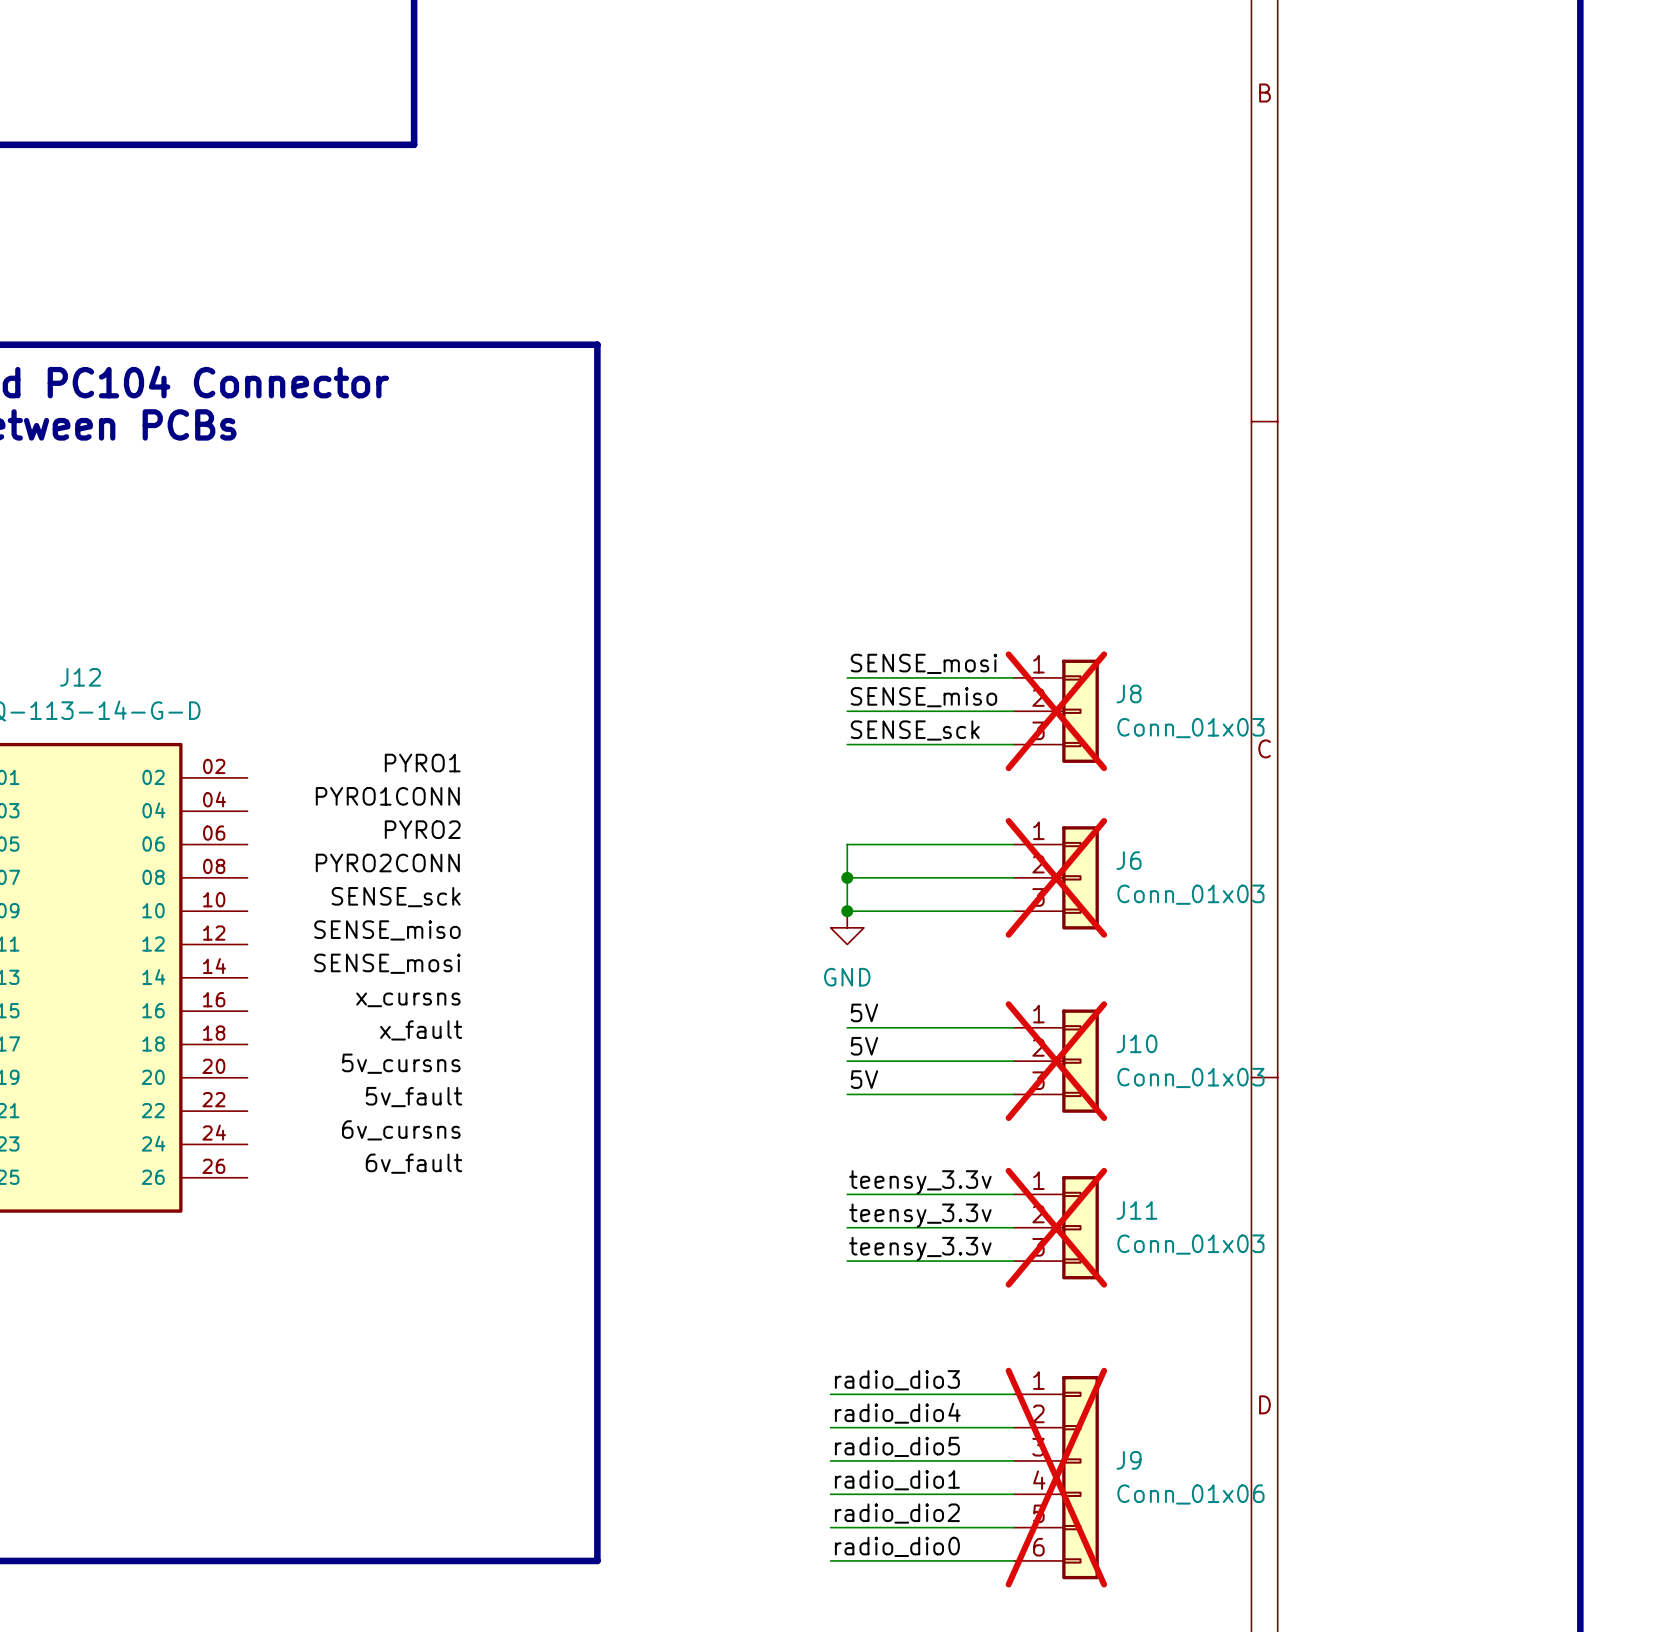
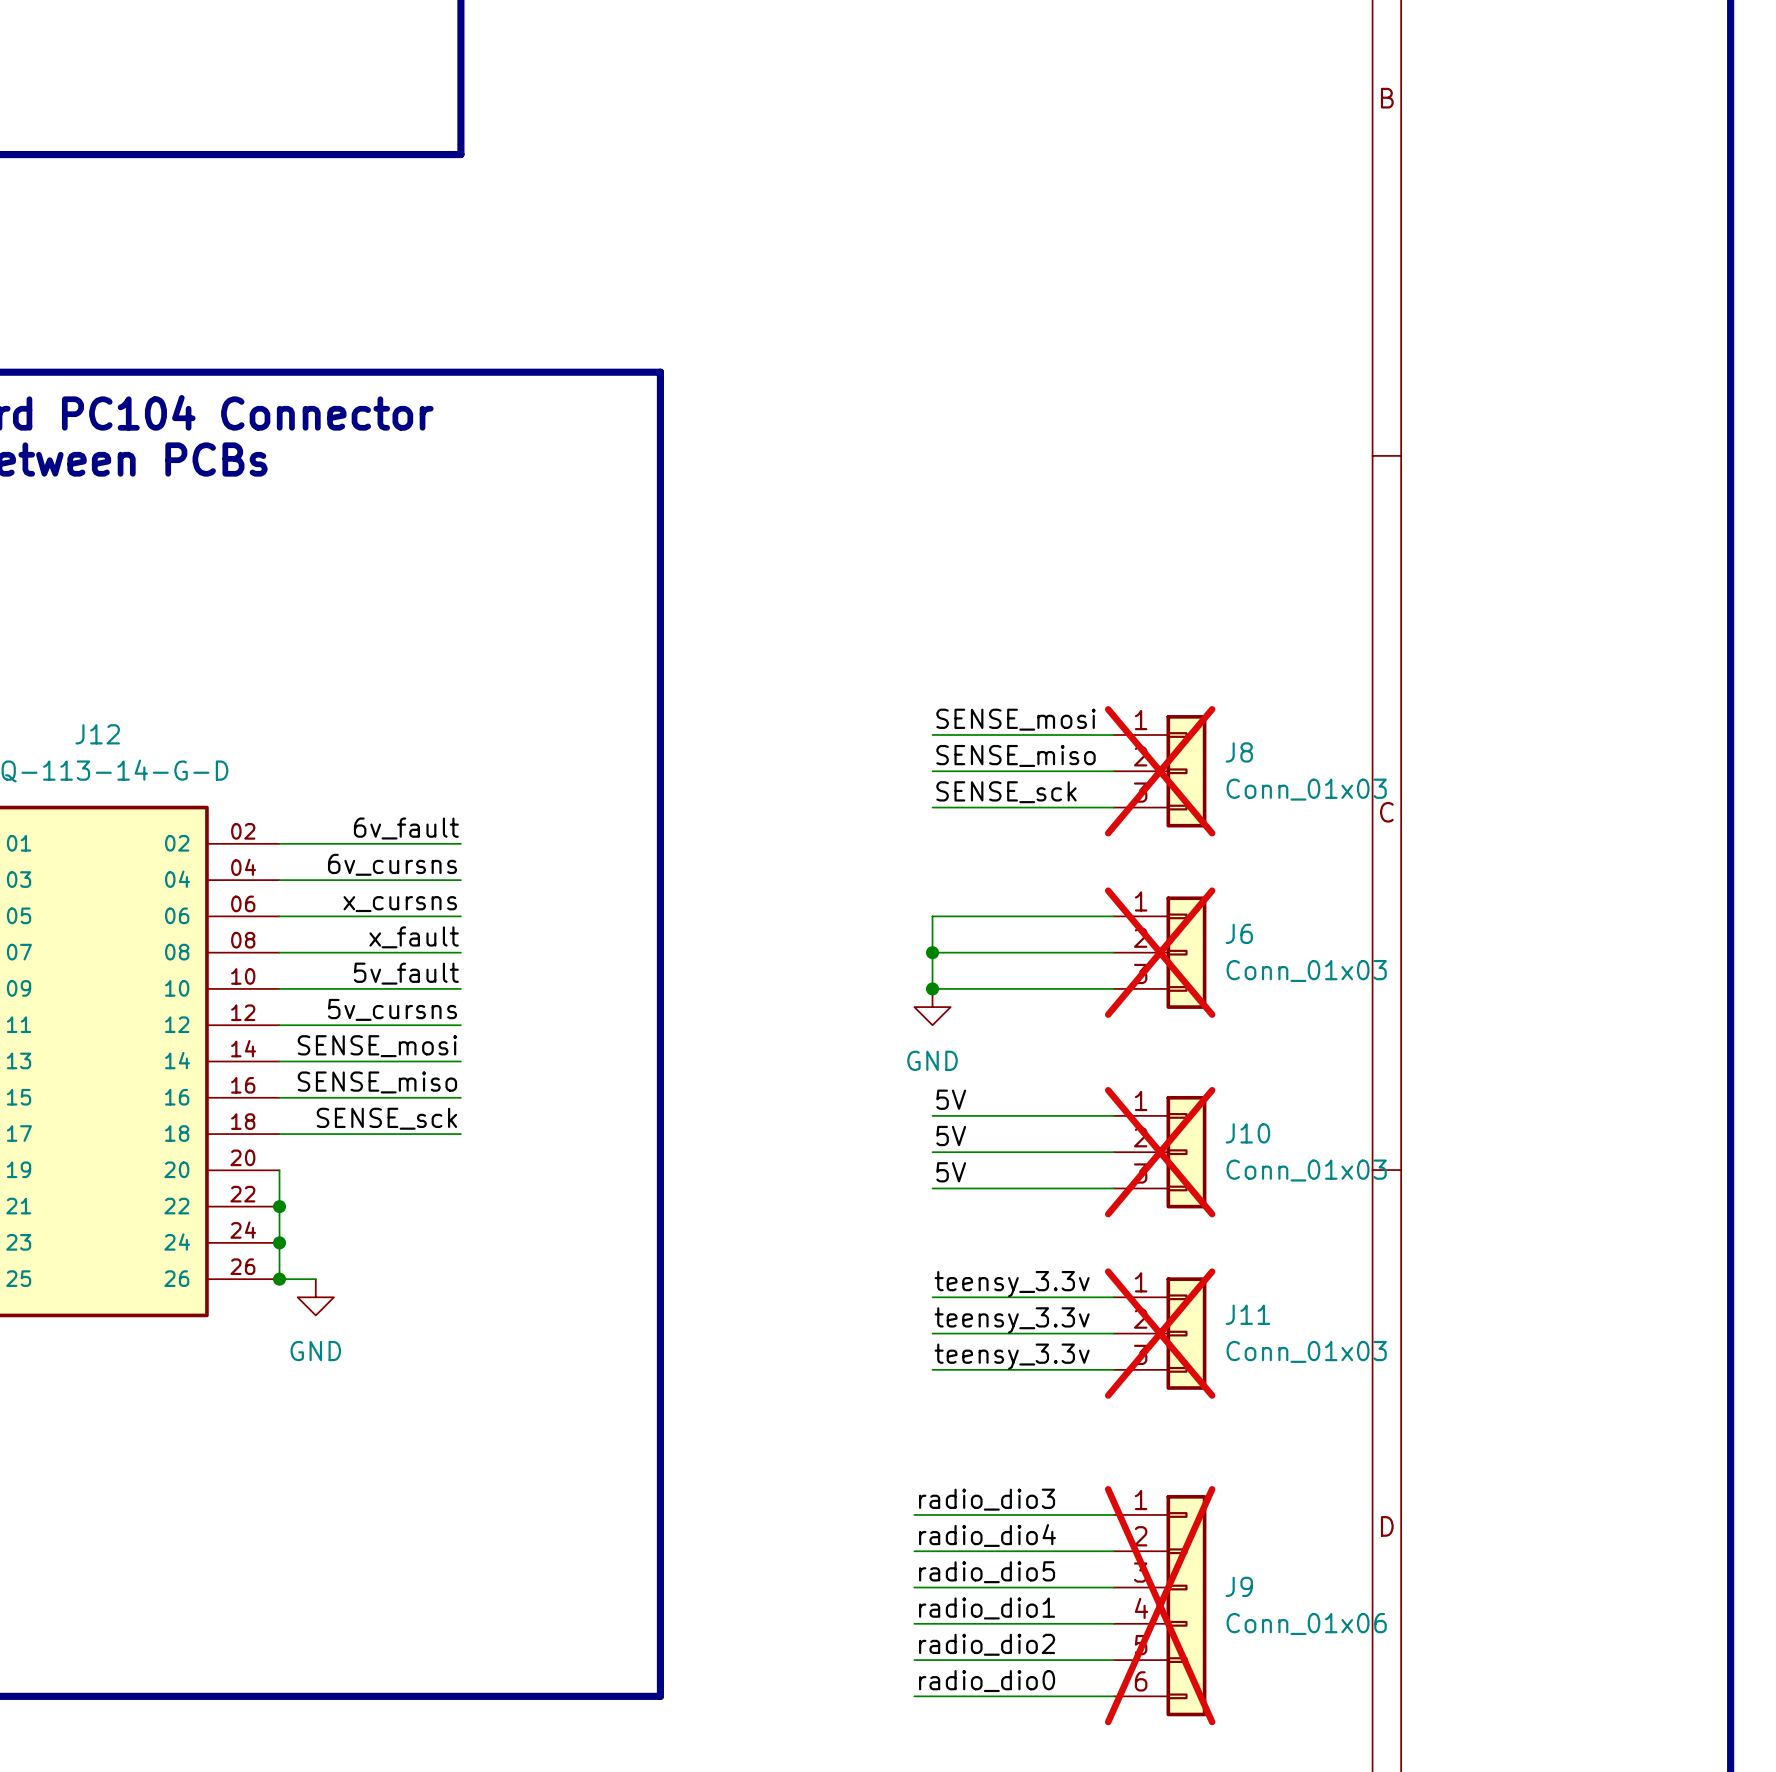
label: none -> 6v_fault (406, 828)
label: PYRO1 (422, 763) -> none
wire: none -> (279, 843) (460, 843)
label: PYRO1CONN (387, 796) -> none
label: none -> 6v_cursns (392, 864)
wire: none -> (279, 880) (460, 880)
label: PYRO2 (422, 829) -> none
wire: none -> (279, 916) (460, 916)
label: PYRO2CONN (387, 863) -> none
wire: none -> (279, 952) (460, 952)
label position: SENSE_sck (396, 897) -> SENSE_sck (386, 1118)
wire: none -> (279, 988) (460, 988)
label position: SENSE_miso (387, 930) -> SENSE_miso (377, 1082)
wire: none -> (279, 1025) (460, 1025)
label position: SENSE_mosi (387, 963) -> SENSE_mosi (377, 1046)
wire: none -> (279, 1061) (460, 1061)
label position: x_cursns (408, 999) -> x_cursns (400, 904)
wire: none -> (279, 1097) (460, 1097)
label position: x_fault (421, 1030) -> x_fault (414, 937)
wire: none -> (279, 1134) (460, 1134)
label position: 5v_cursns (401, 1063) -> 5v_cursns (392, 1009)
wire: none -> (279, 1170) (279, 1279) (315, 1279)
label position: 5v_fault (413, 1097) -> 5v_fault (406, 973)
junction: none -> (279, 1206)
label: 6v_cursns (401, 1130) -> none
junction: none -> (279, 1242)
label: 6v_fault (413, 1163) -> none
junction: none -> (279, 1279)
power symbol: none -> GND (315, 1297)

